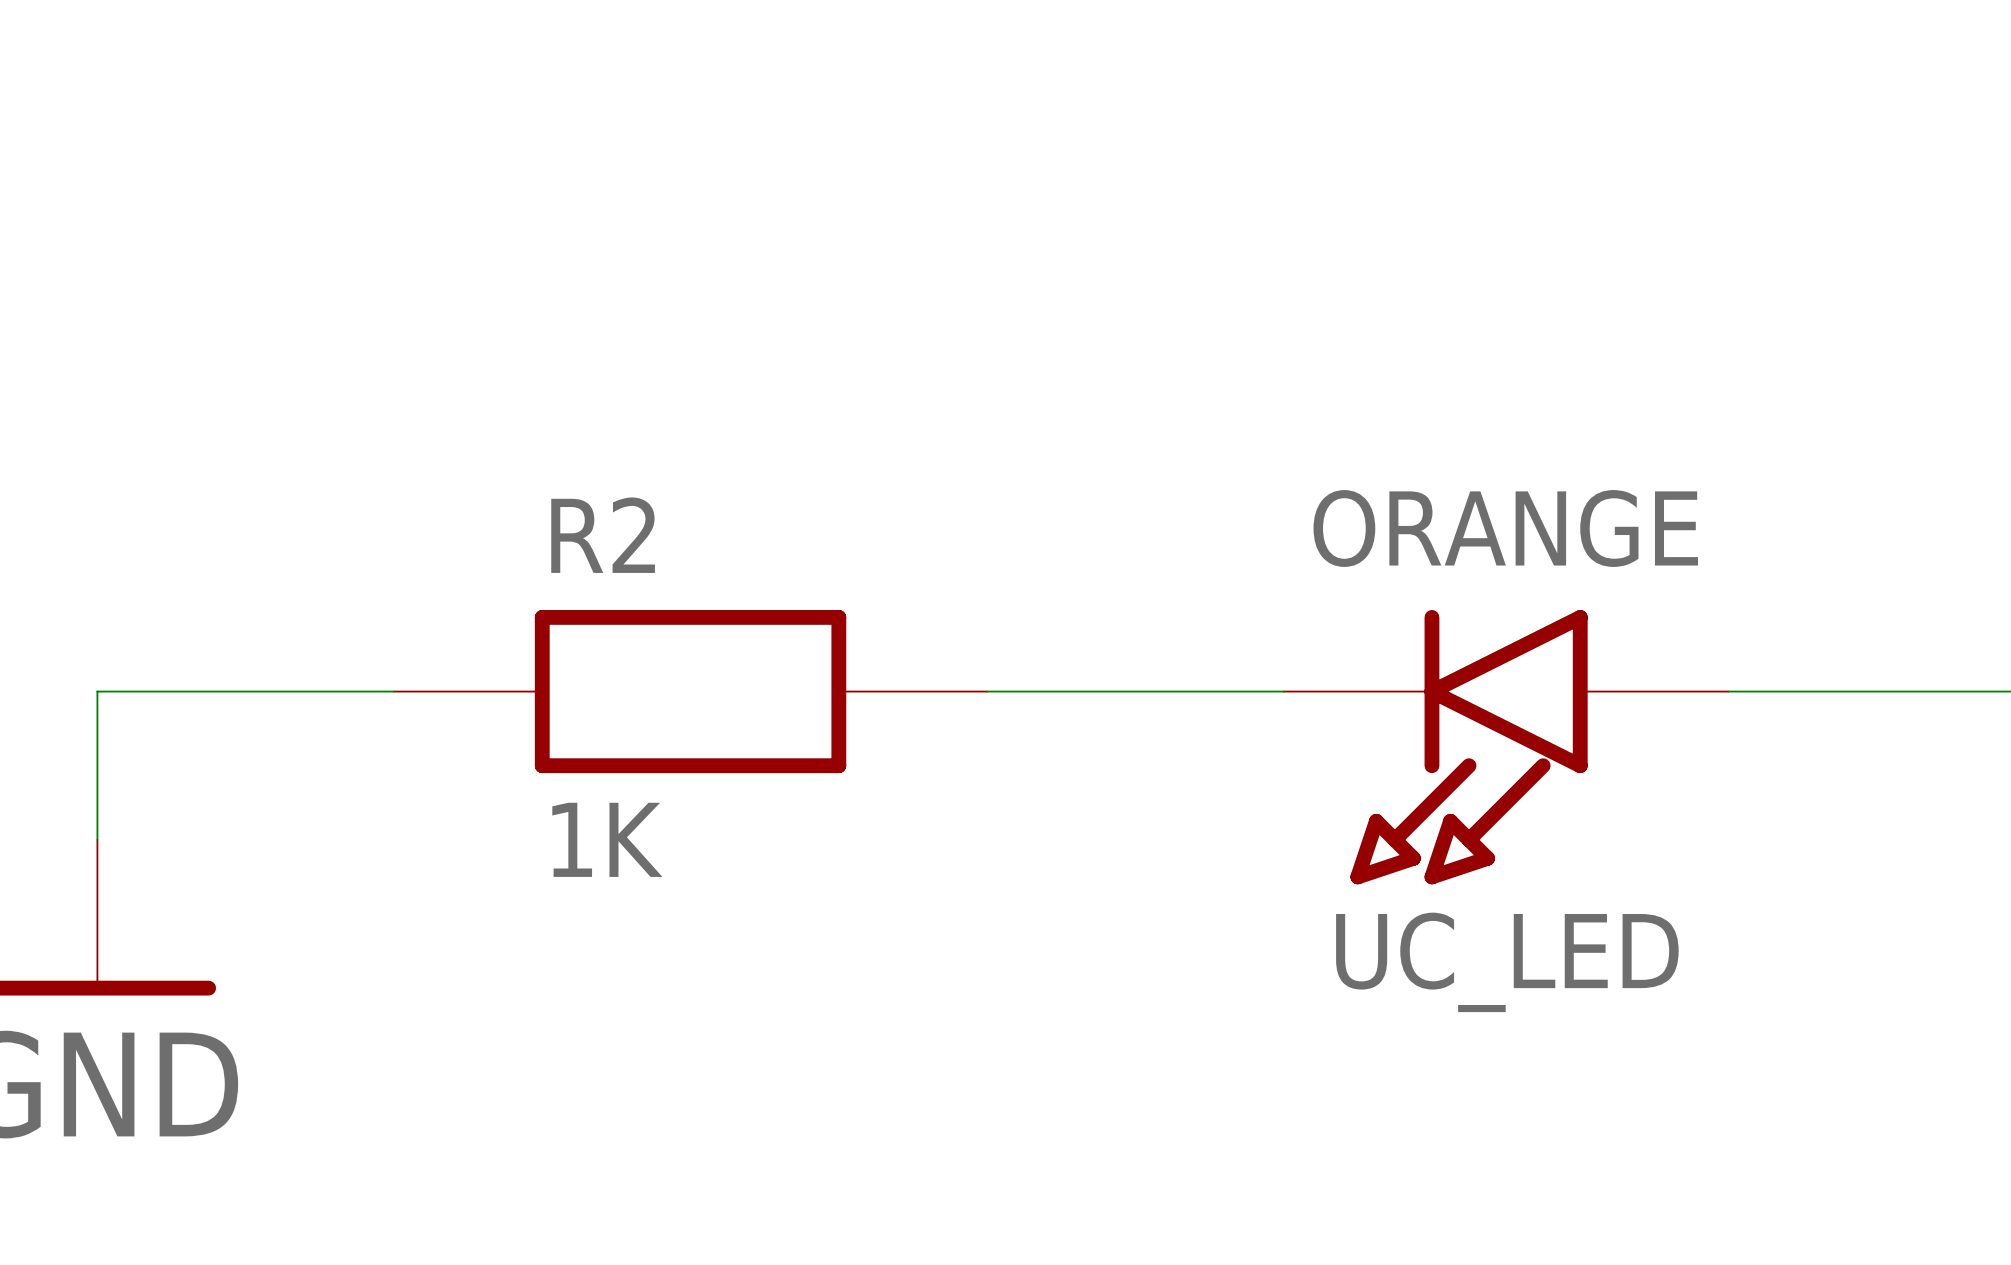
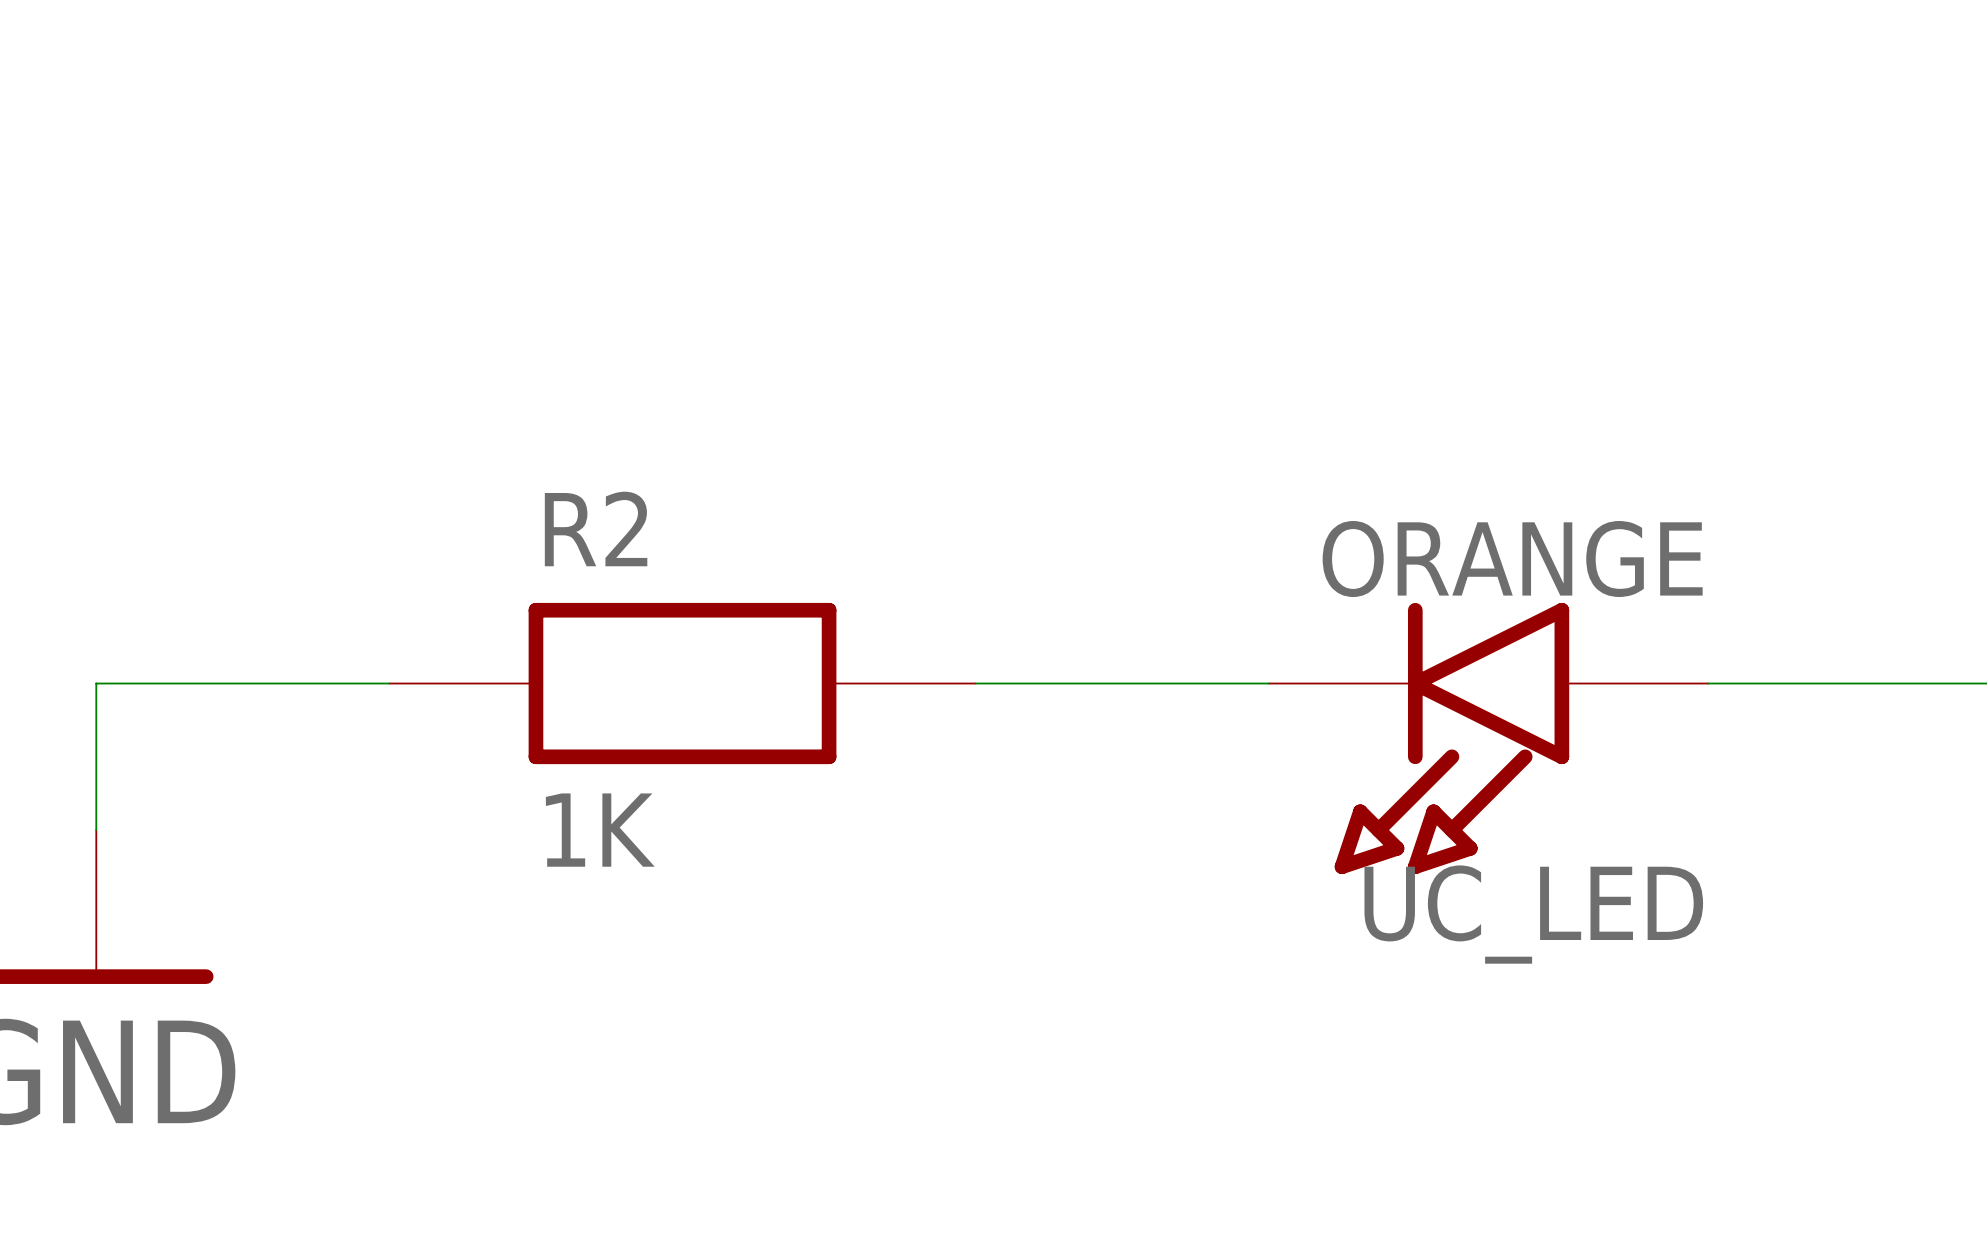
UC_LED value position: ORANGE (1505, 528) -> ORANGE (1512, 559)
UC_LED name position: UC_LED (1507, 962) -> UC_LED (1533, 914)

